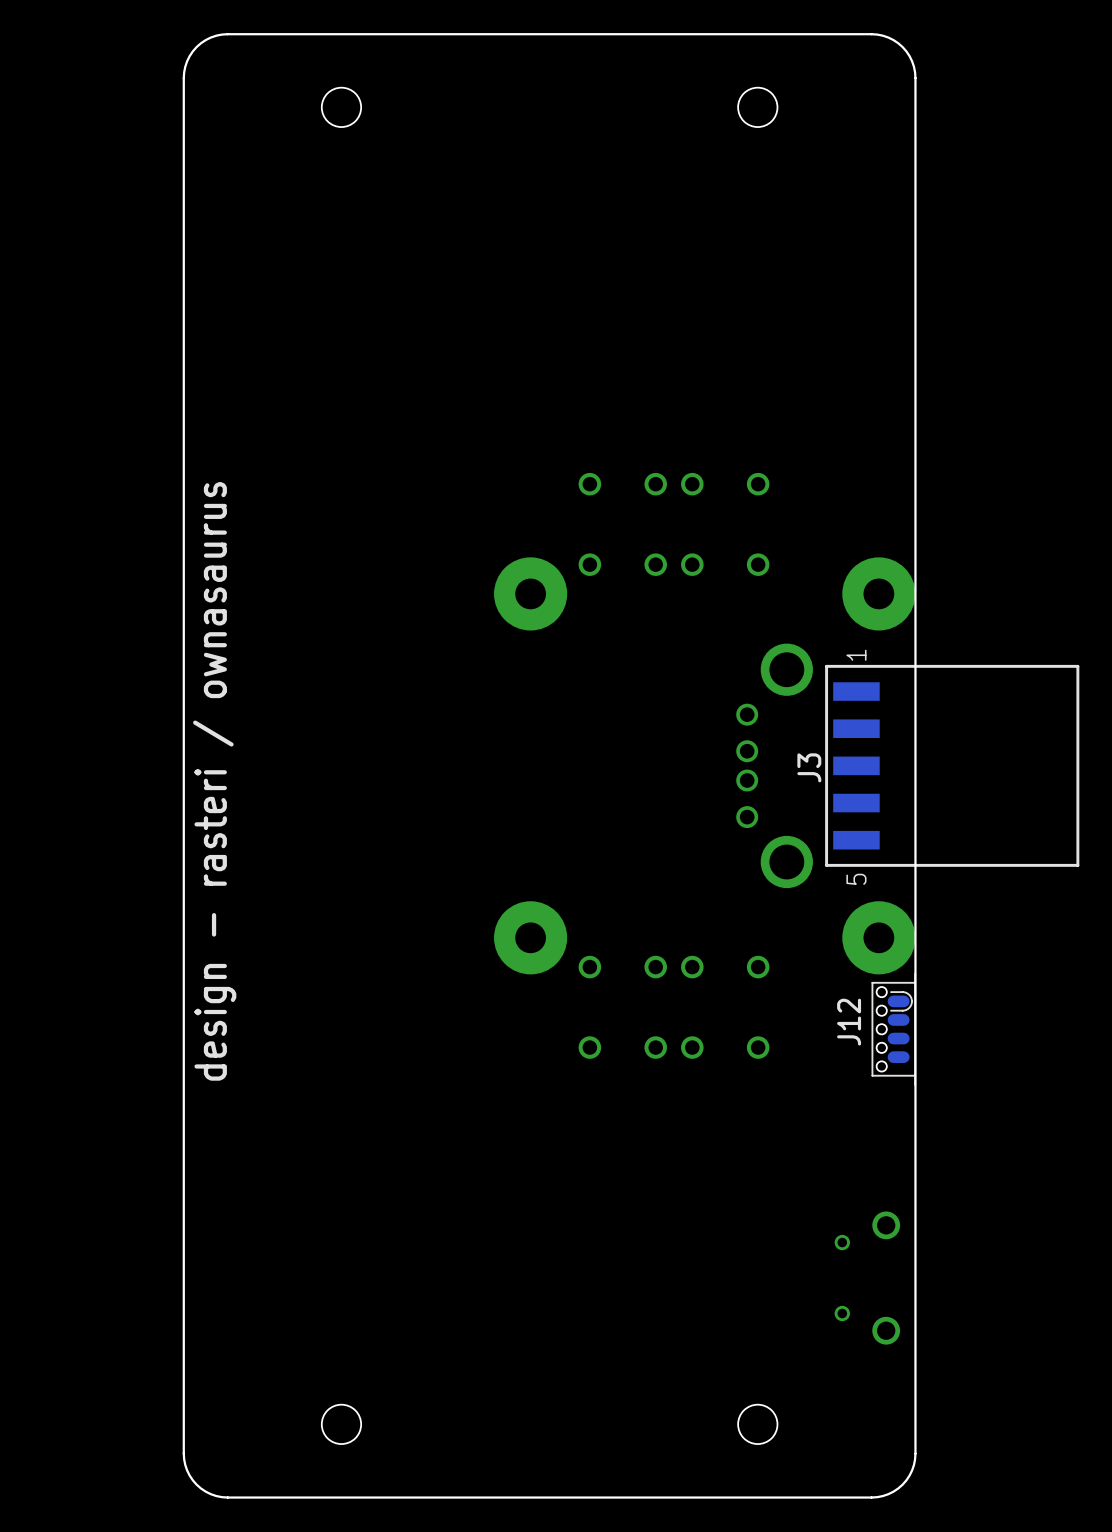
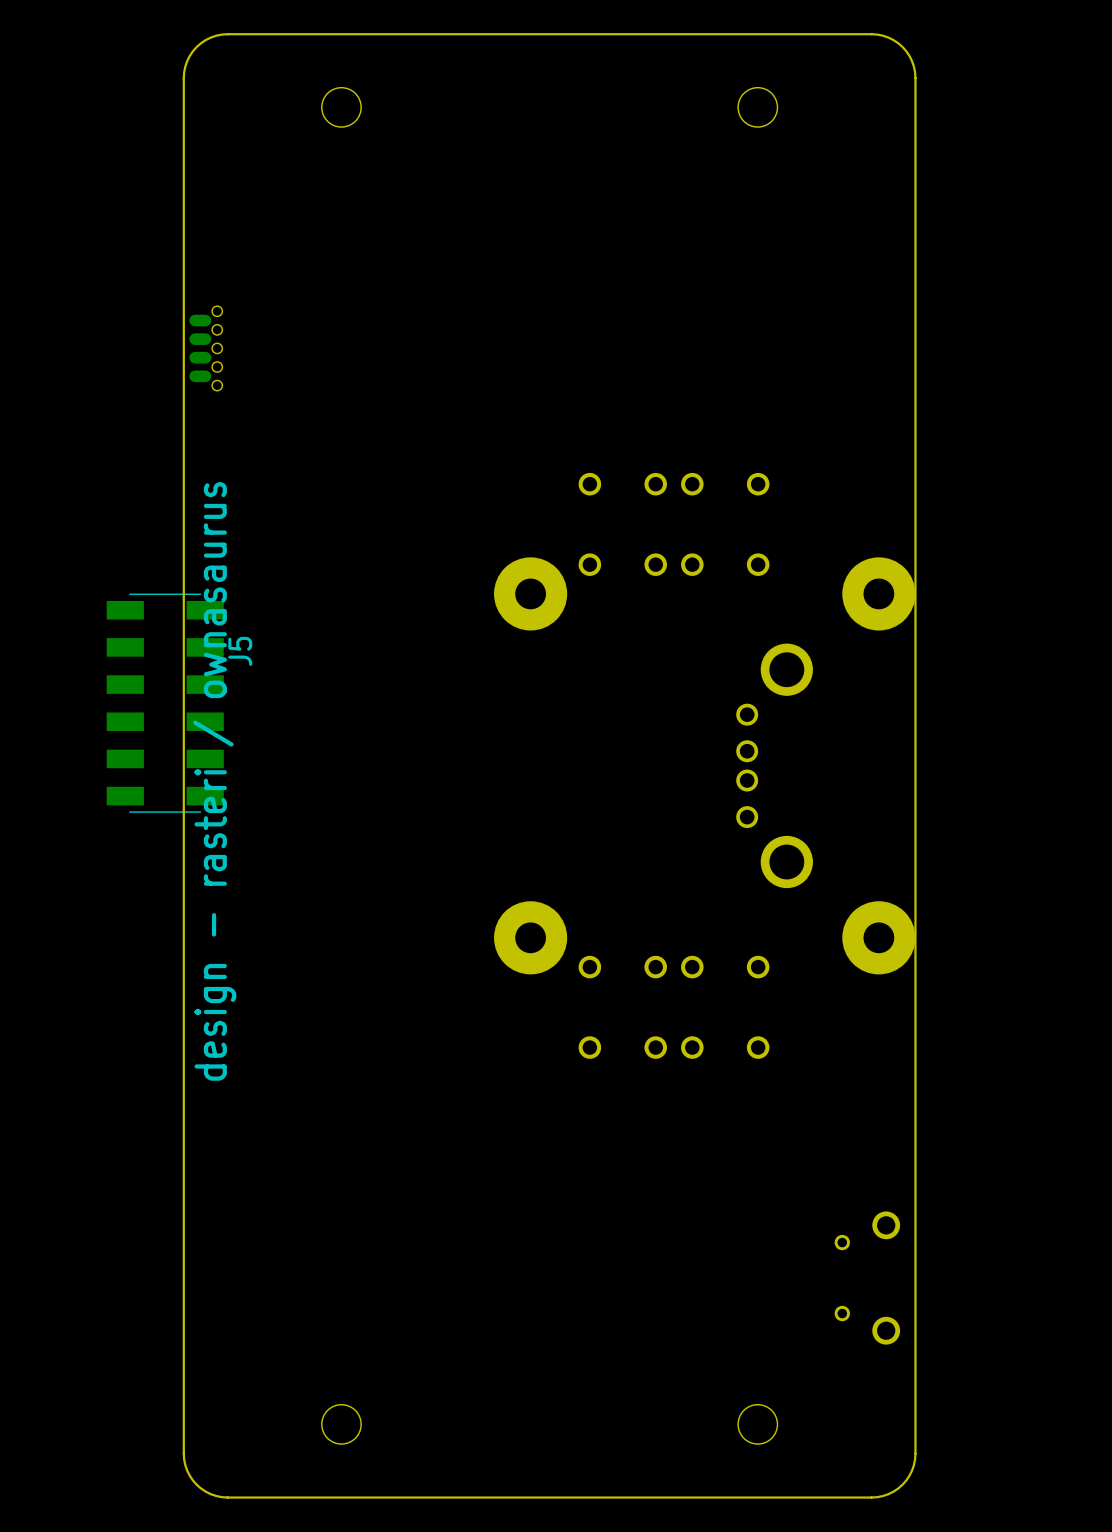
part: none -> (205, 348)
J5: none -> (165, 703)
J3: (952, 765) -> none
J12: (893, 1029) -> none

